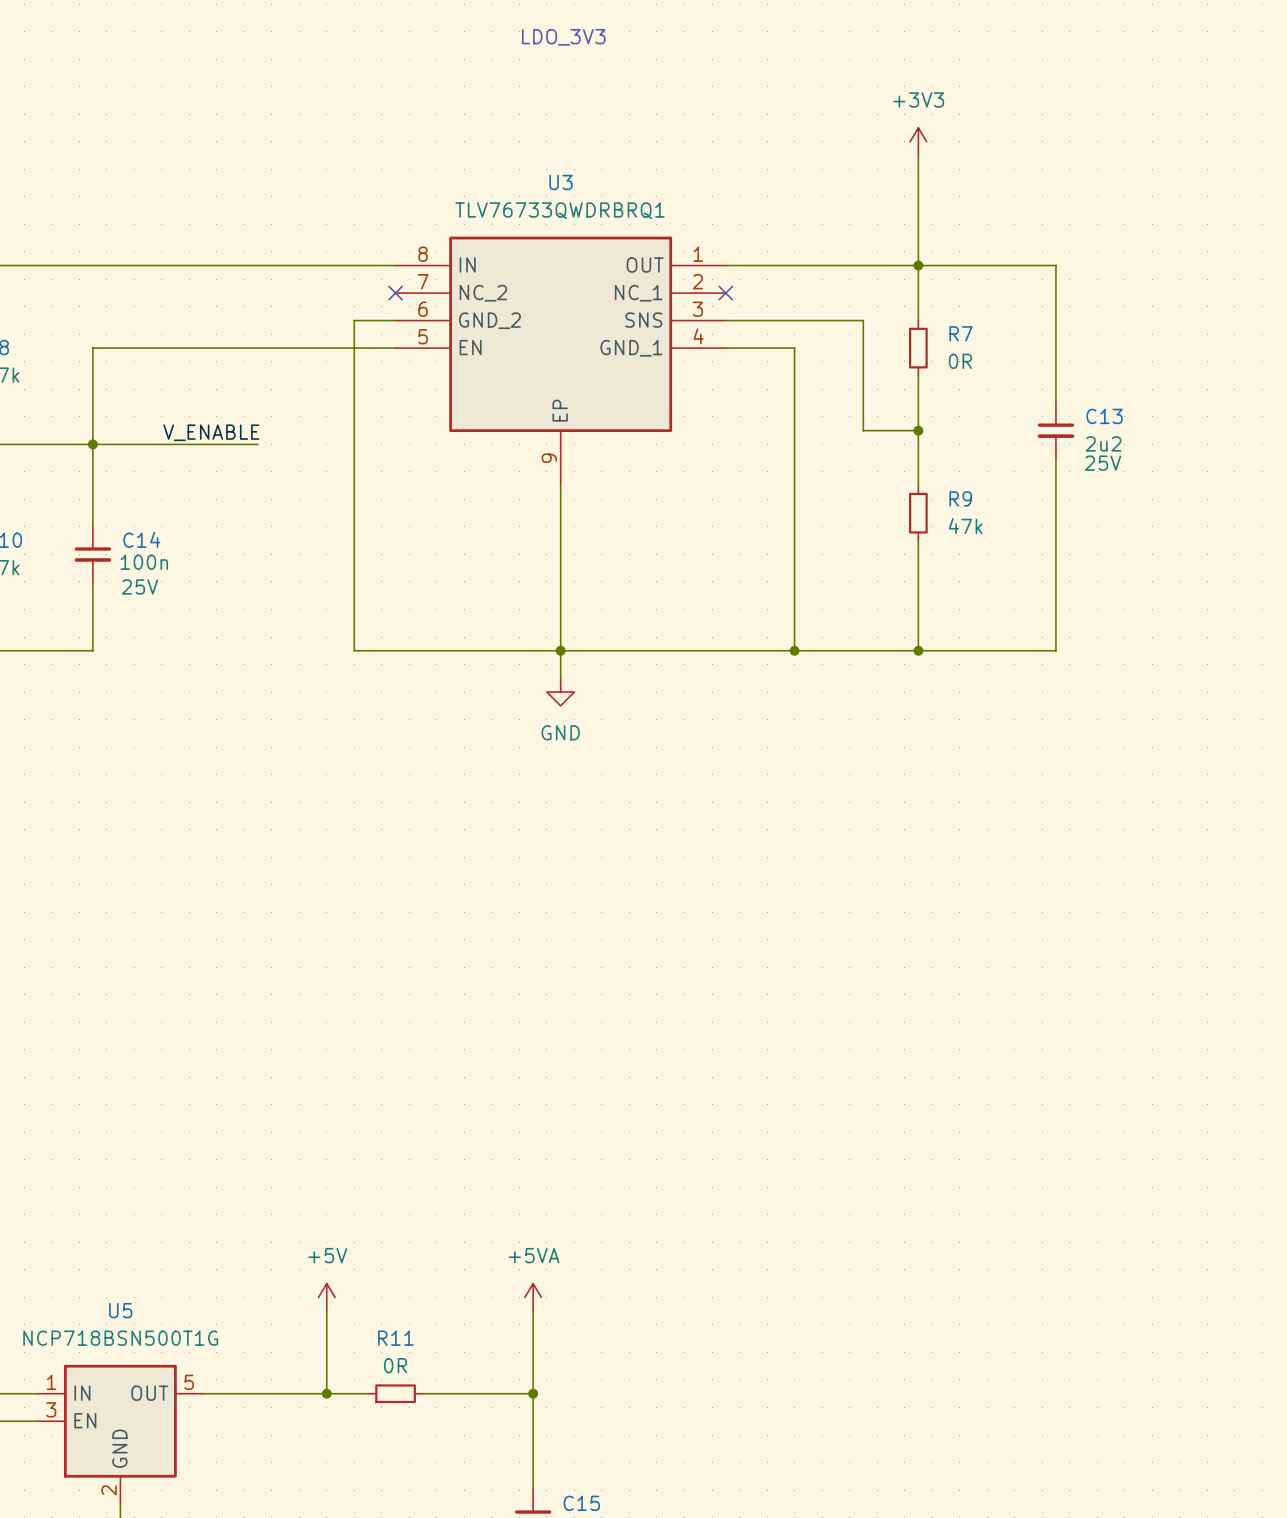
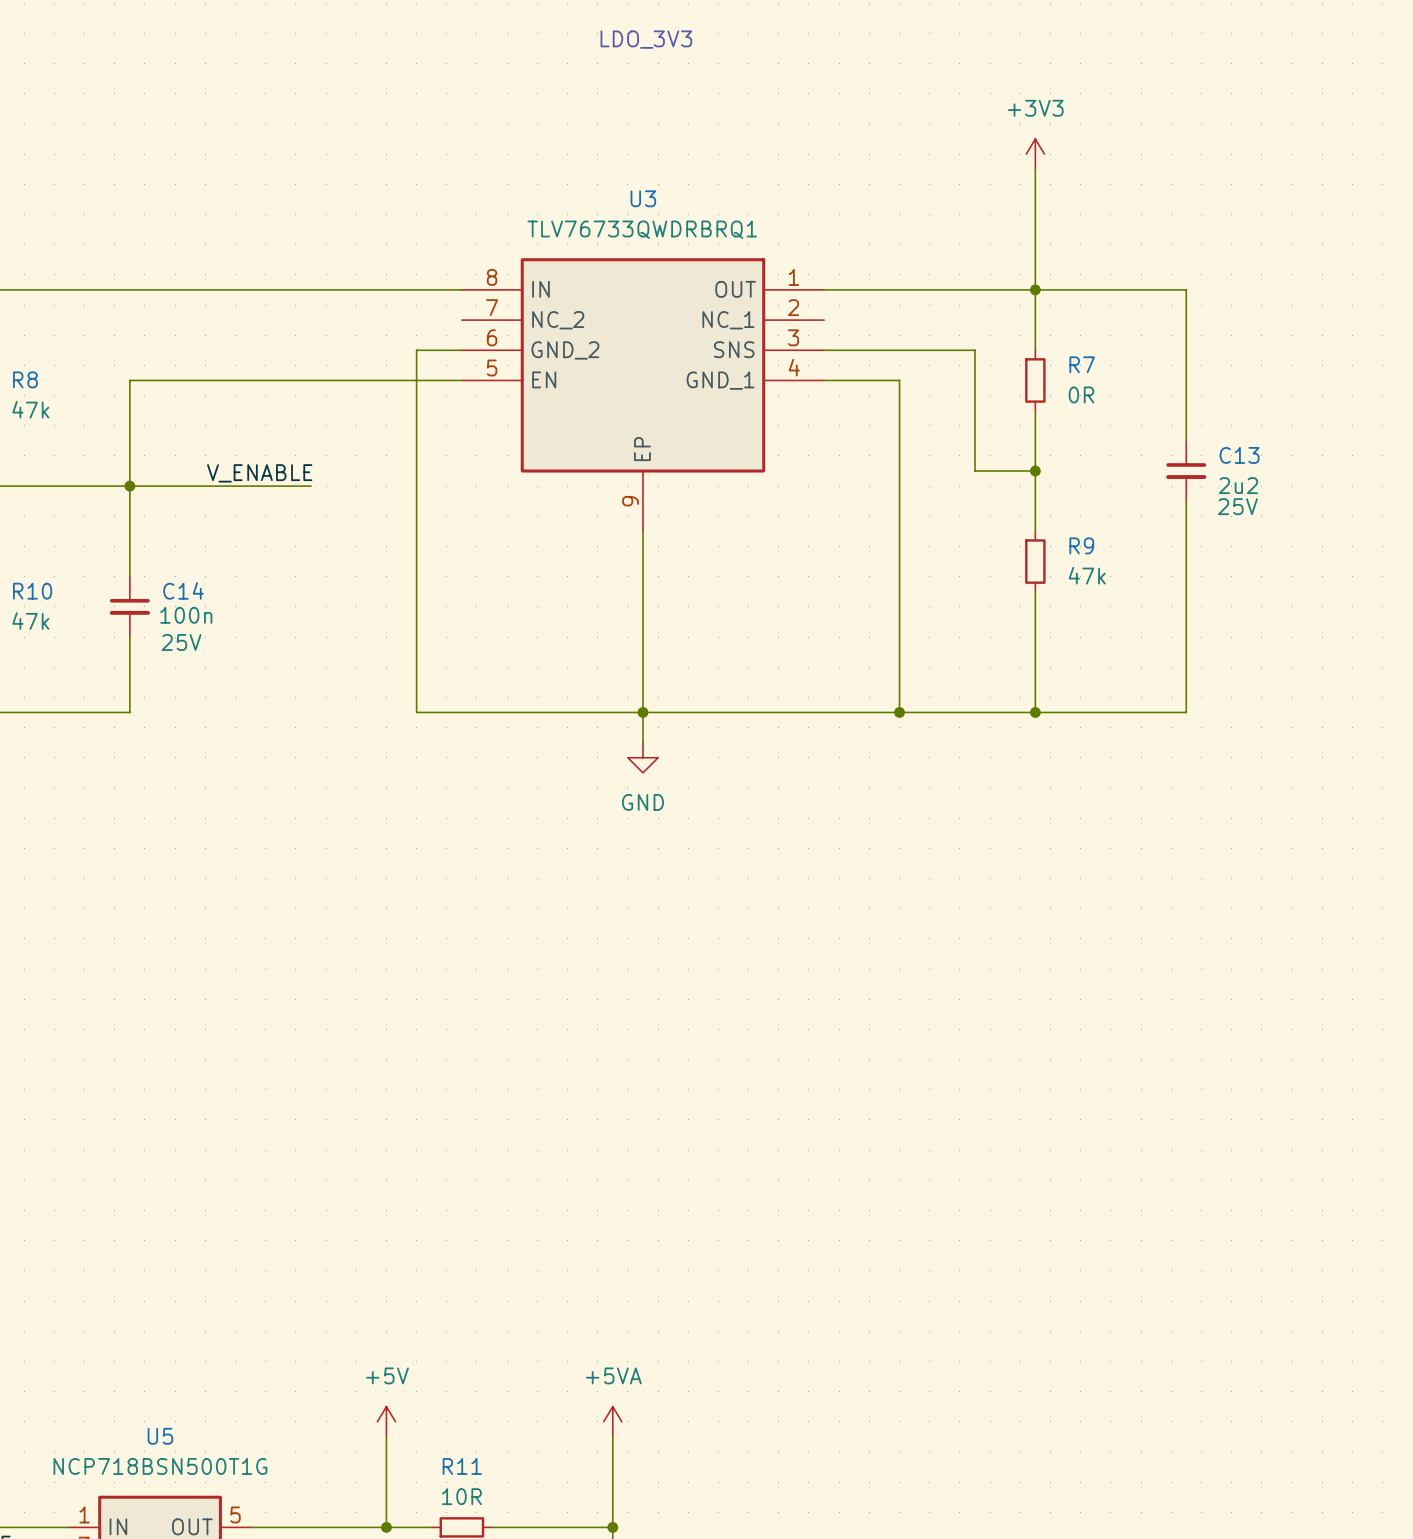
no-connect mark: (395, 293) -> none
no-connect mark: (725, 293) -> none
R11 value: 0R (395, 1365) -> 10R (461, 1496)

